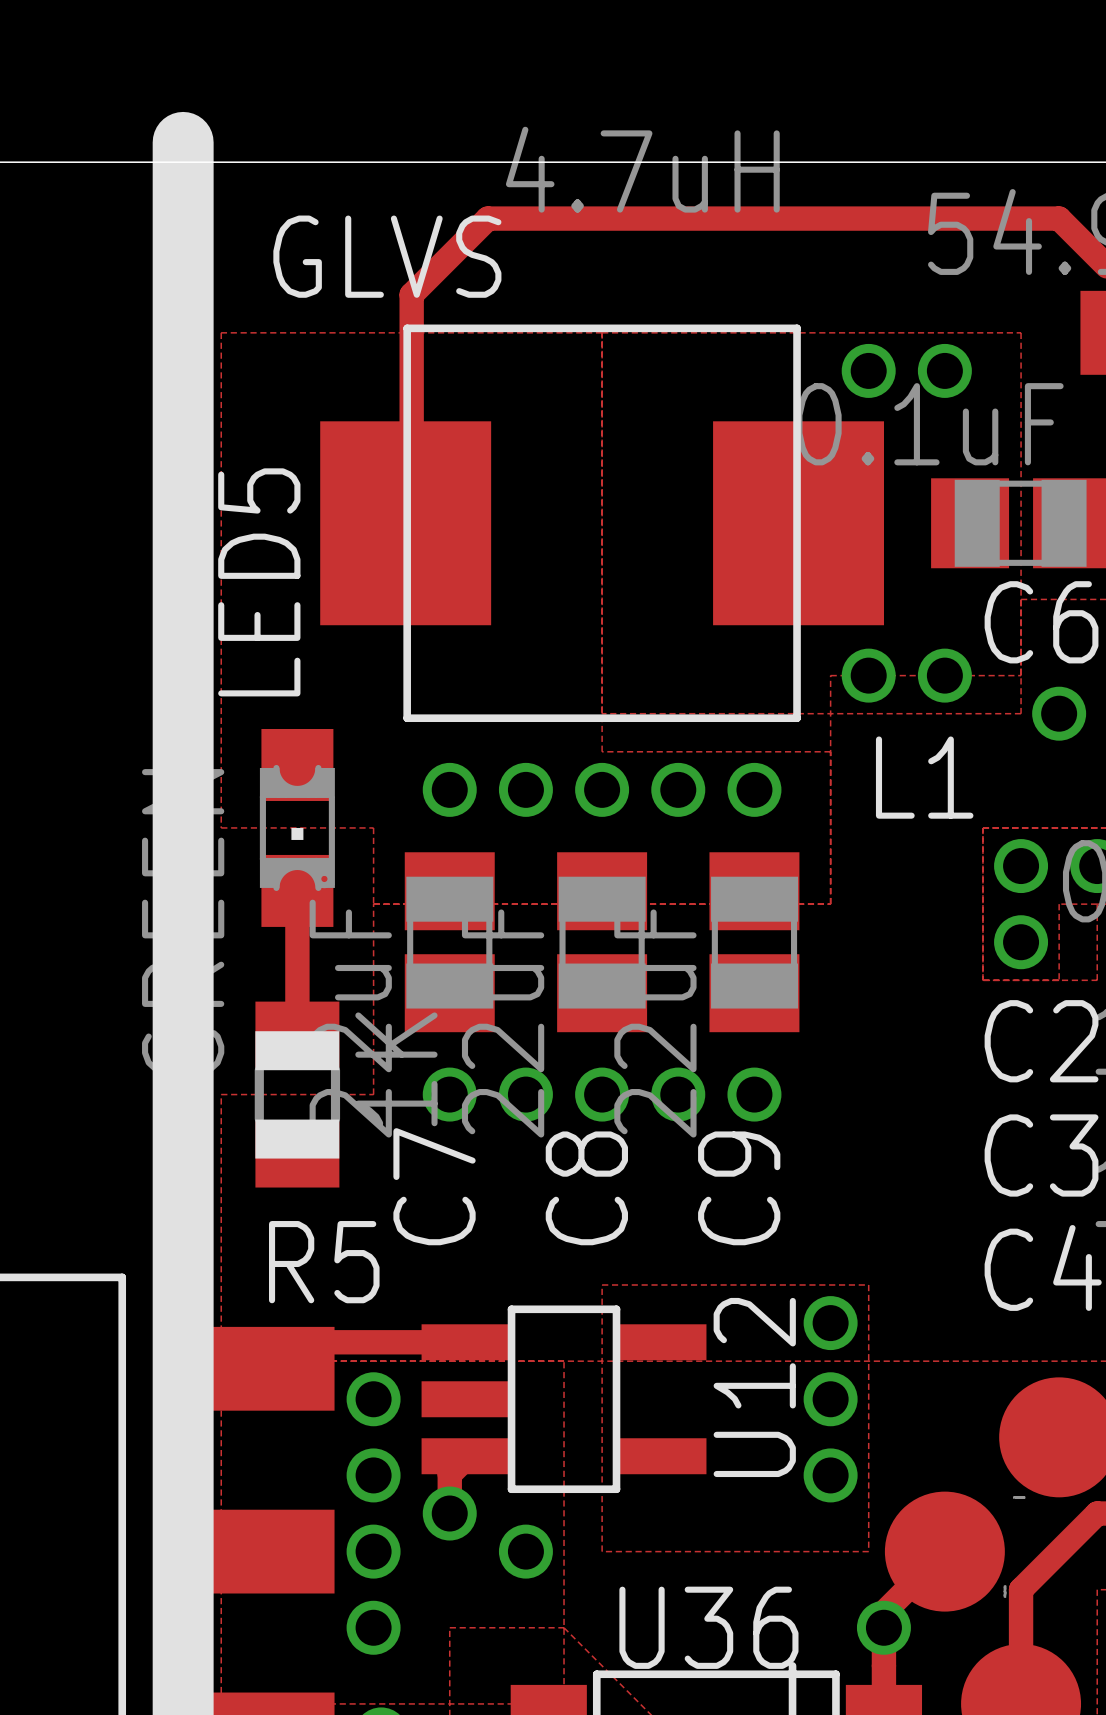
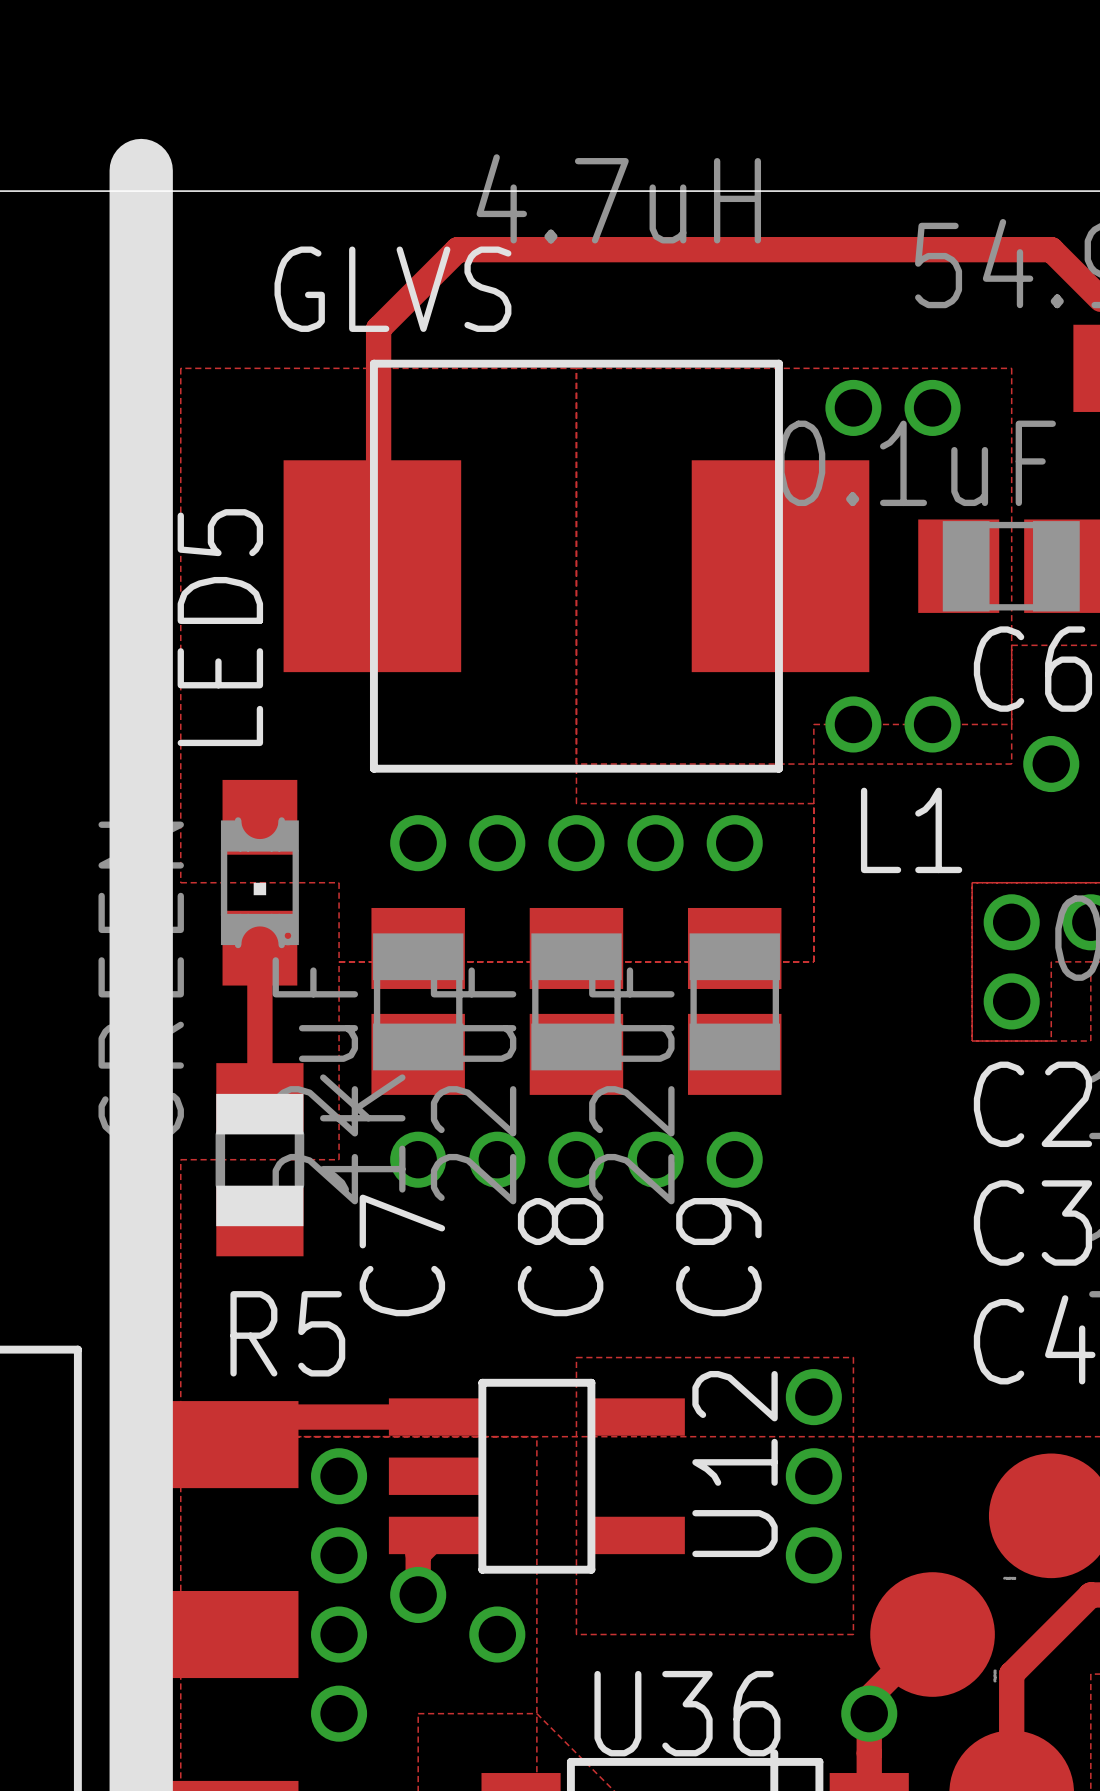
text position: GLVS (387, 256) -> GLVS (392, 289)

